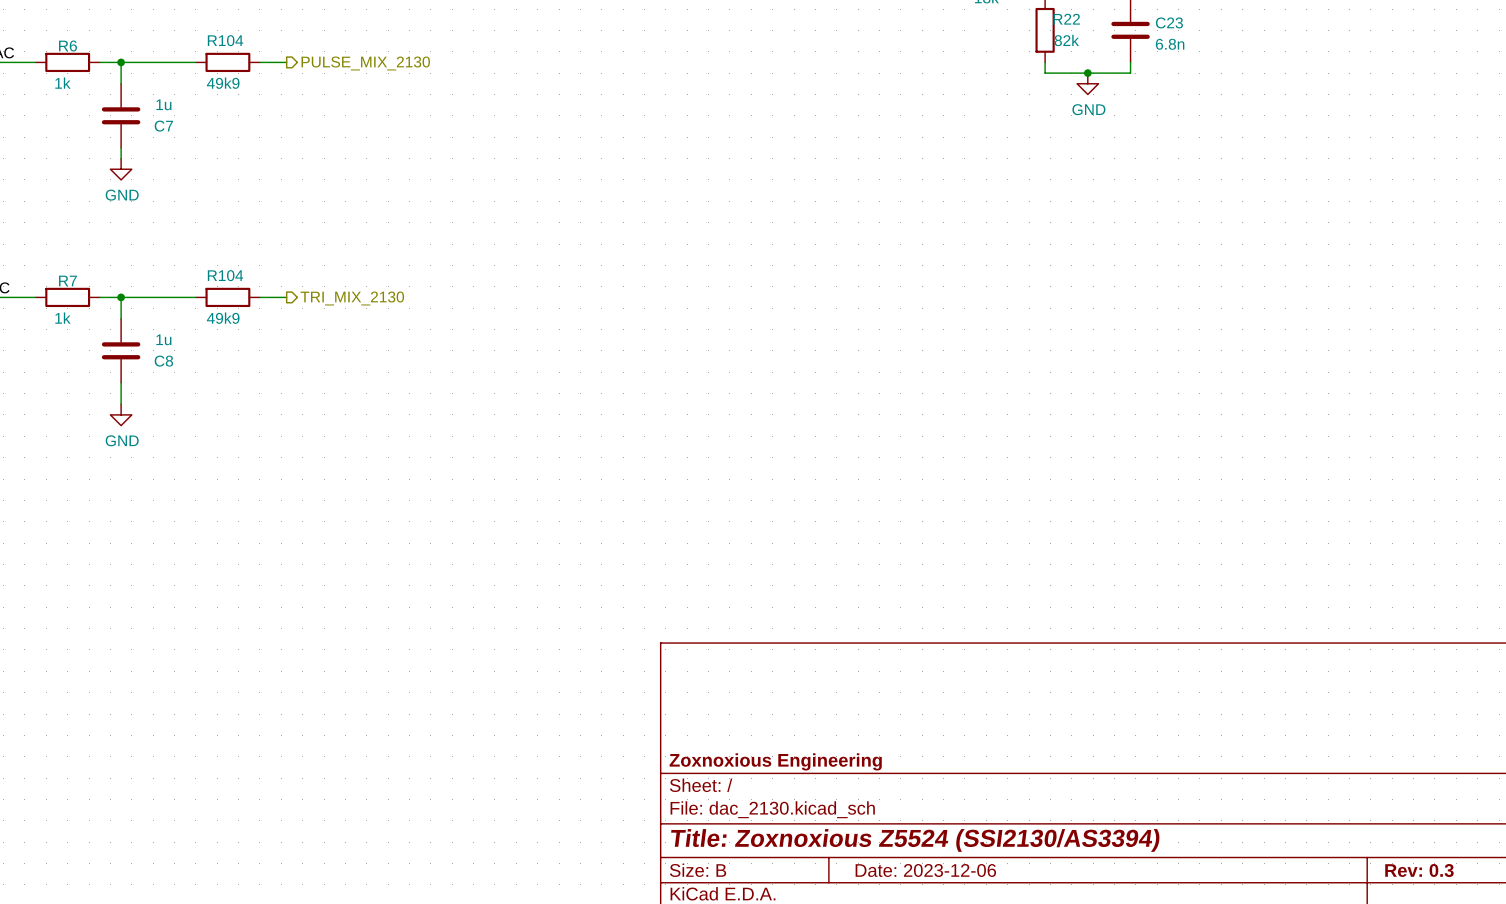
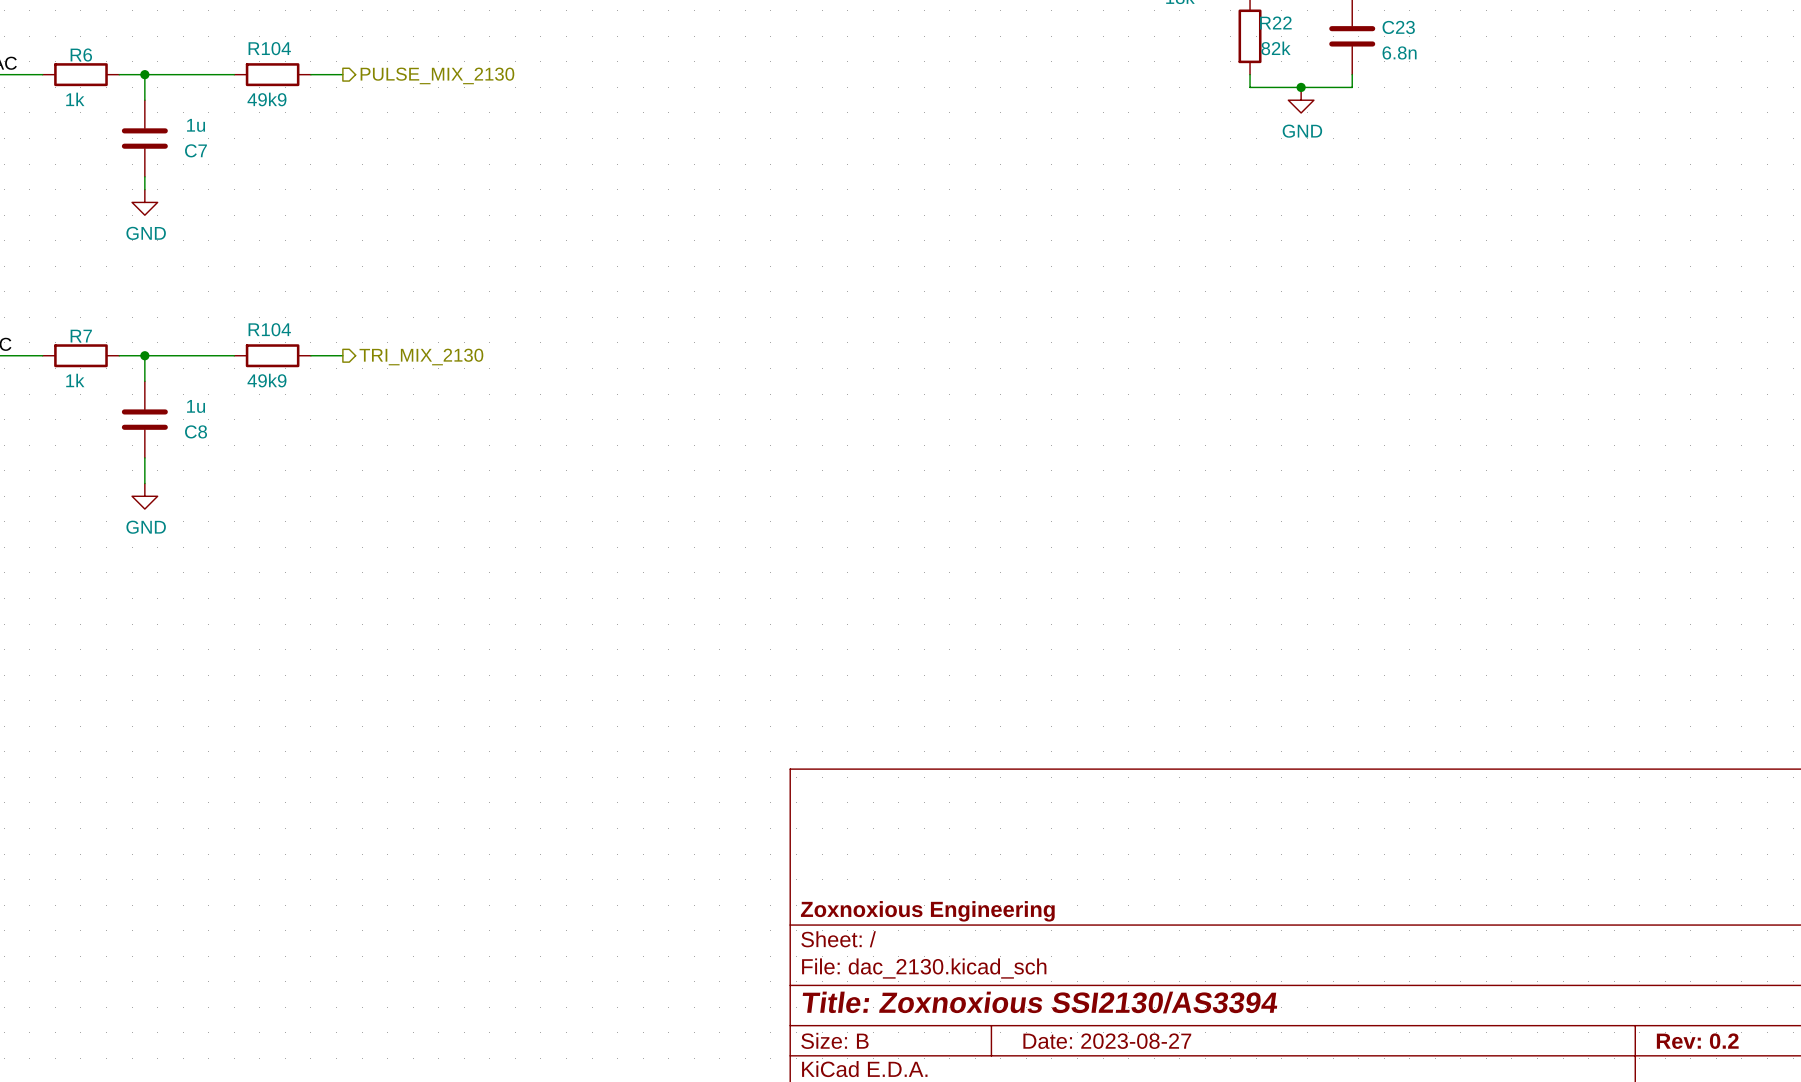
title block: Title: Zoxnoxious Z5524 (SSI2130/AS3394) (915, 840) -> Title: Zoxnoxious SSI2130/AS3394 (1039, 1002)
title block: Date: 2023-12-06 (925, 870) -> Date: 2023-08-27 (1107, 1041)
title block: Rev: 0.3 (1419, 870) -> Rev: 0.2 (1697, 1041)

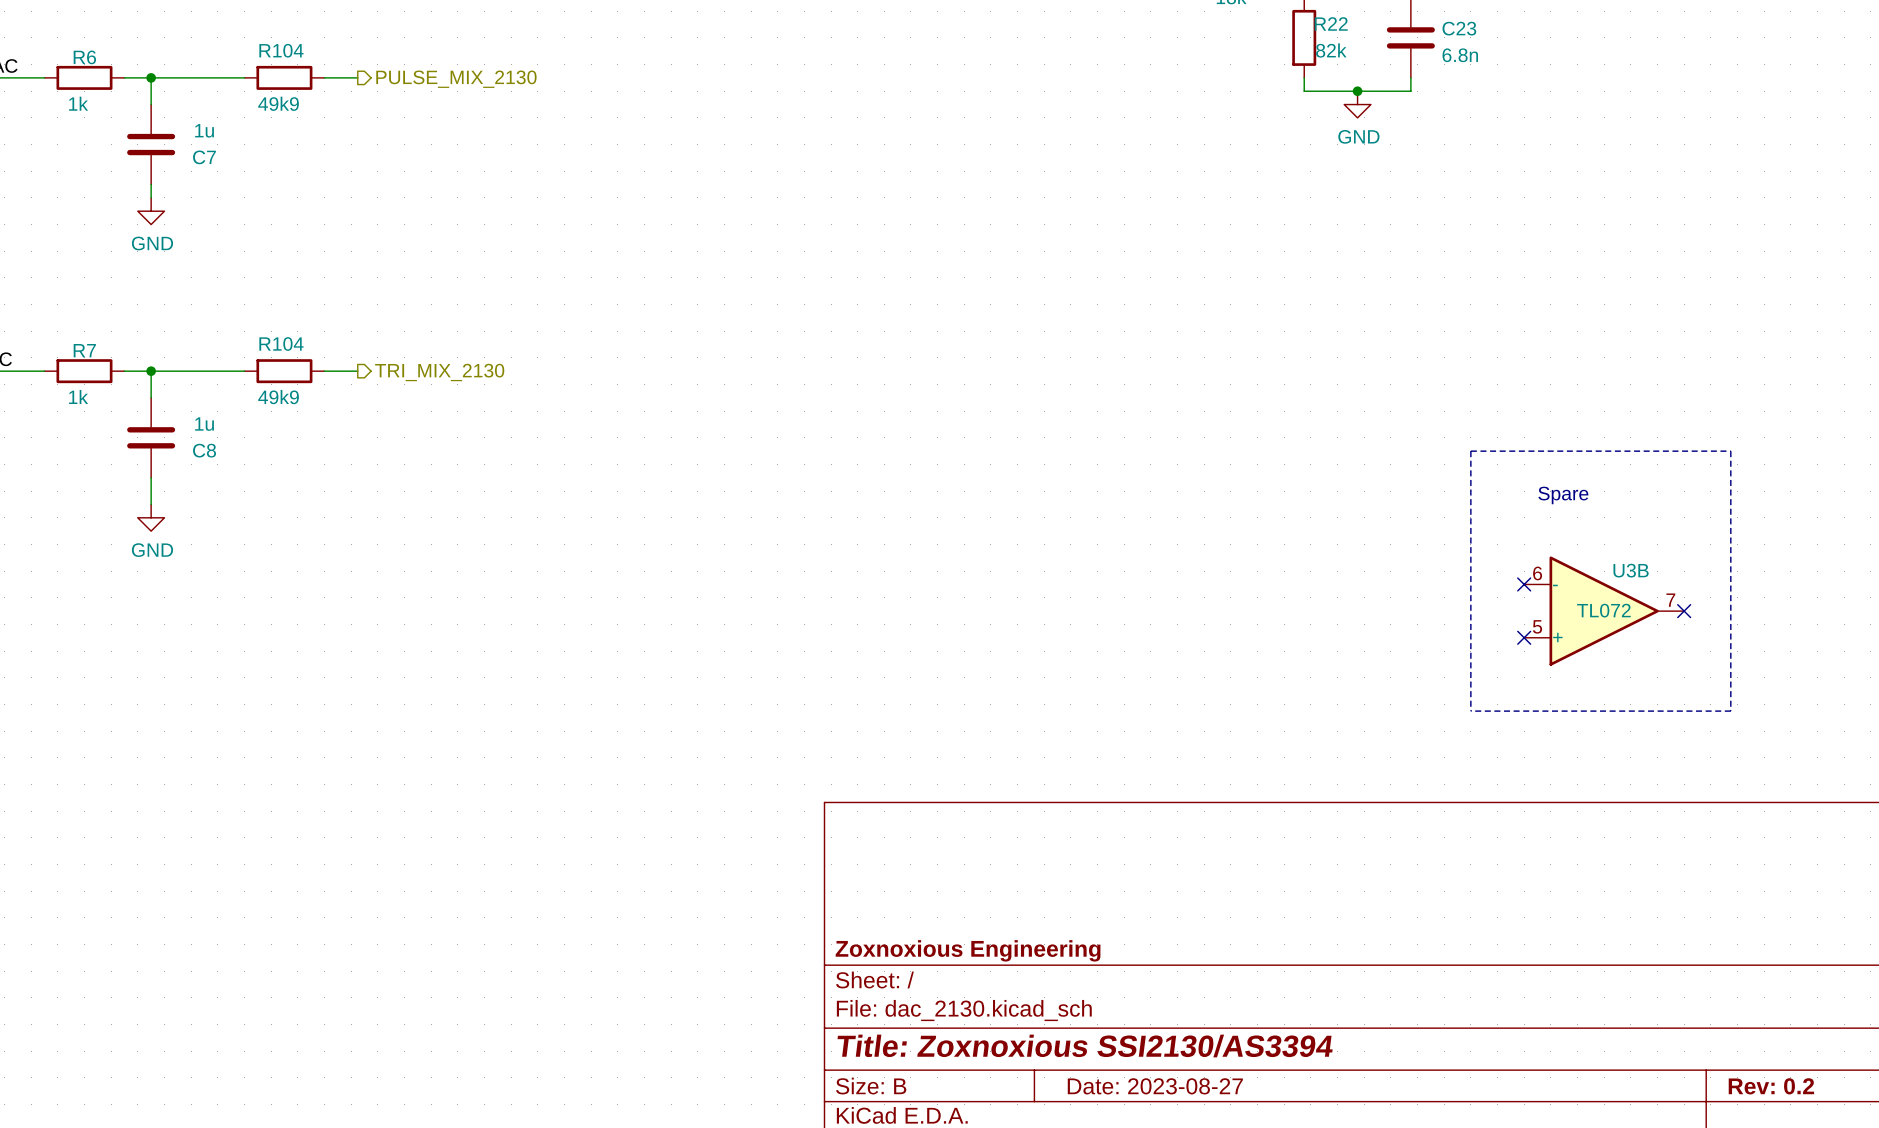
line: none -> (1470, 451) (1730, 451) (1730, 711) (1470, 711) (1470, 451)
text: none -> Spare (1563, 495)
no-connect mark: none -> (1524, 584)
U3B: none -> TL072 (1604, 611)
no-connect mark: none -> (1684, 611)
no-connect mark: none -> (1524, 637)

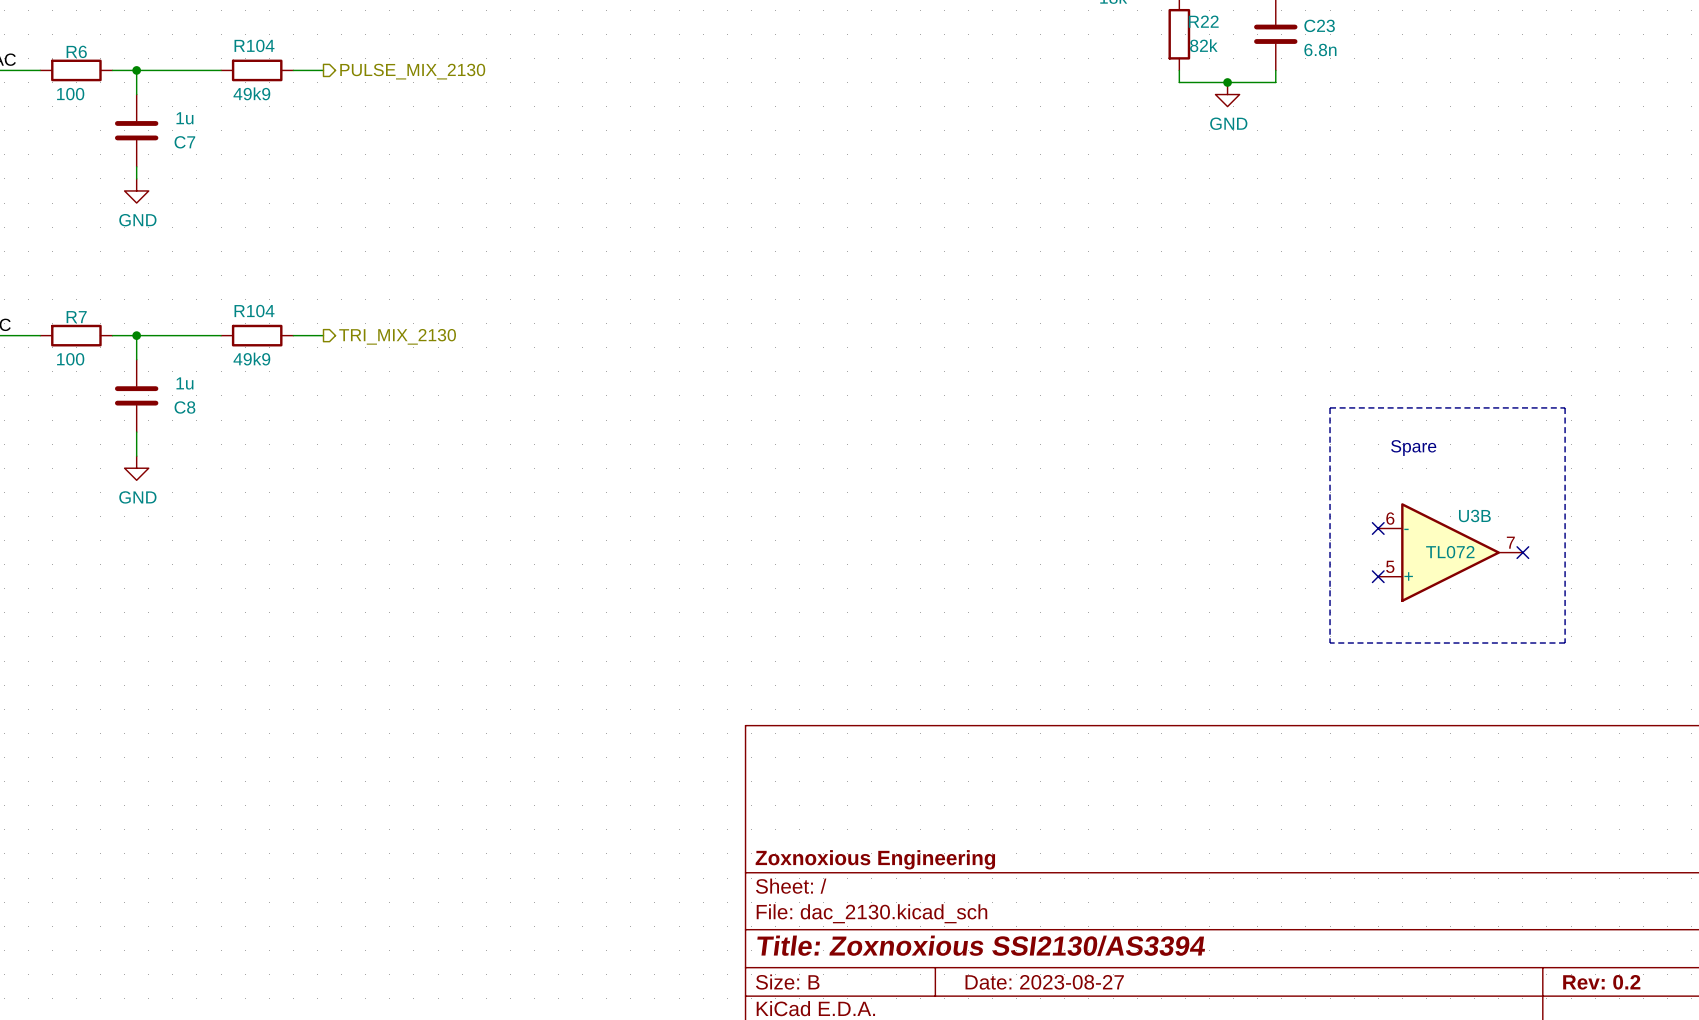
R6 value: 1k (78, 103) -> 100 (70, 94)
R7 value: 1k (78, 396) -> 100 (70, 359)

